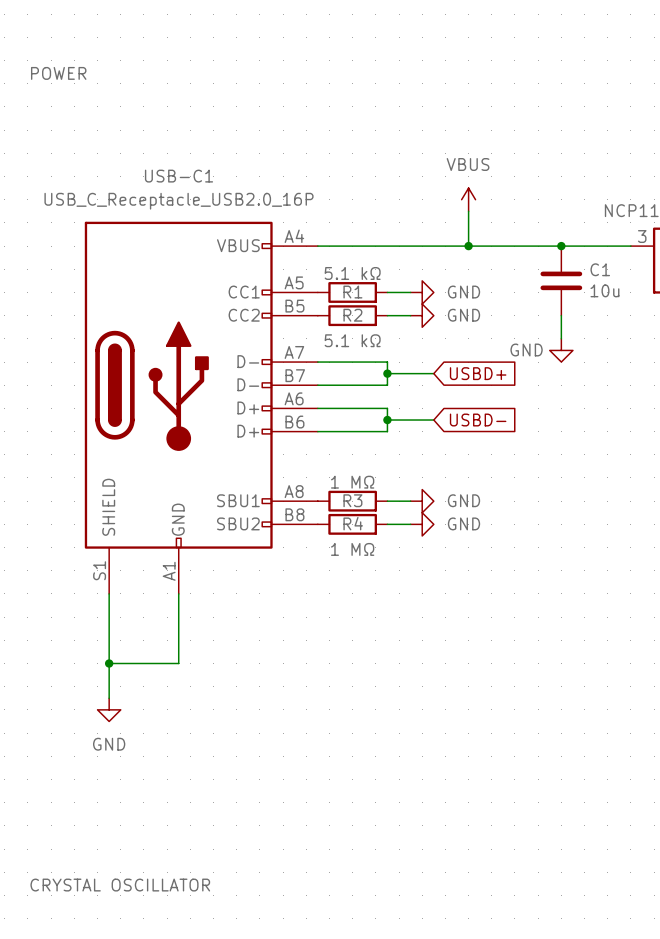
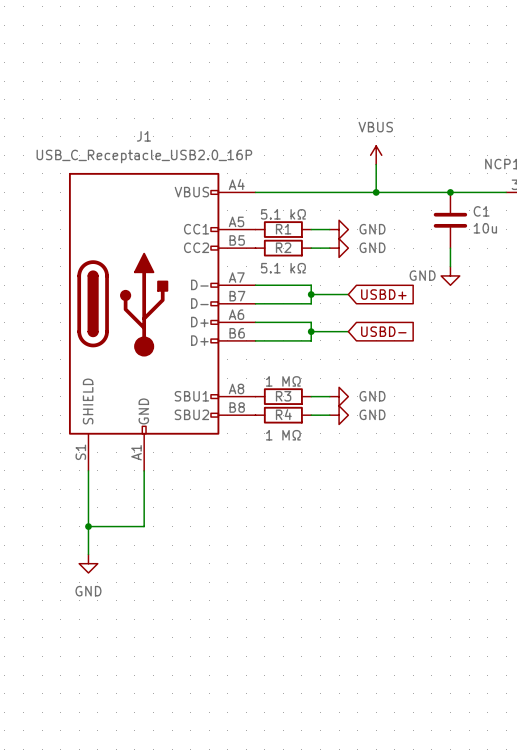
label: POWER (58, 73) -> none
USB-C1 name: USB-C1 (179, 176) -> J1 (143, 136)
label: CRYSTAL OSCILLATOR (120, 885) -> none

